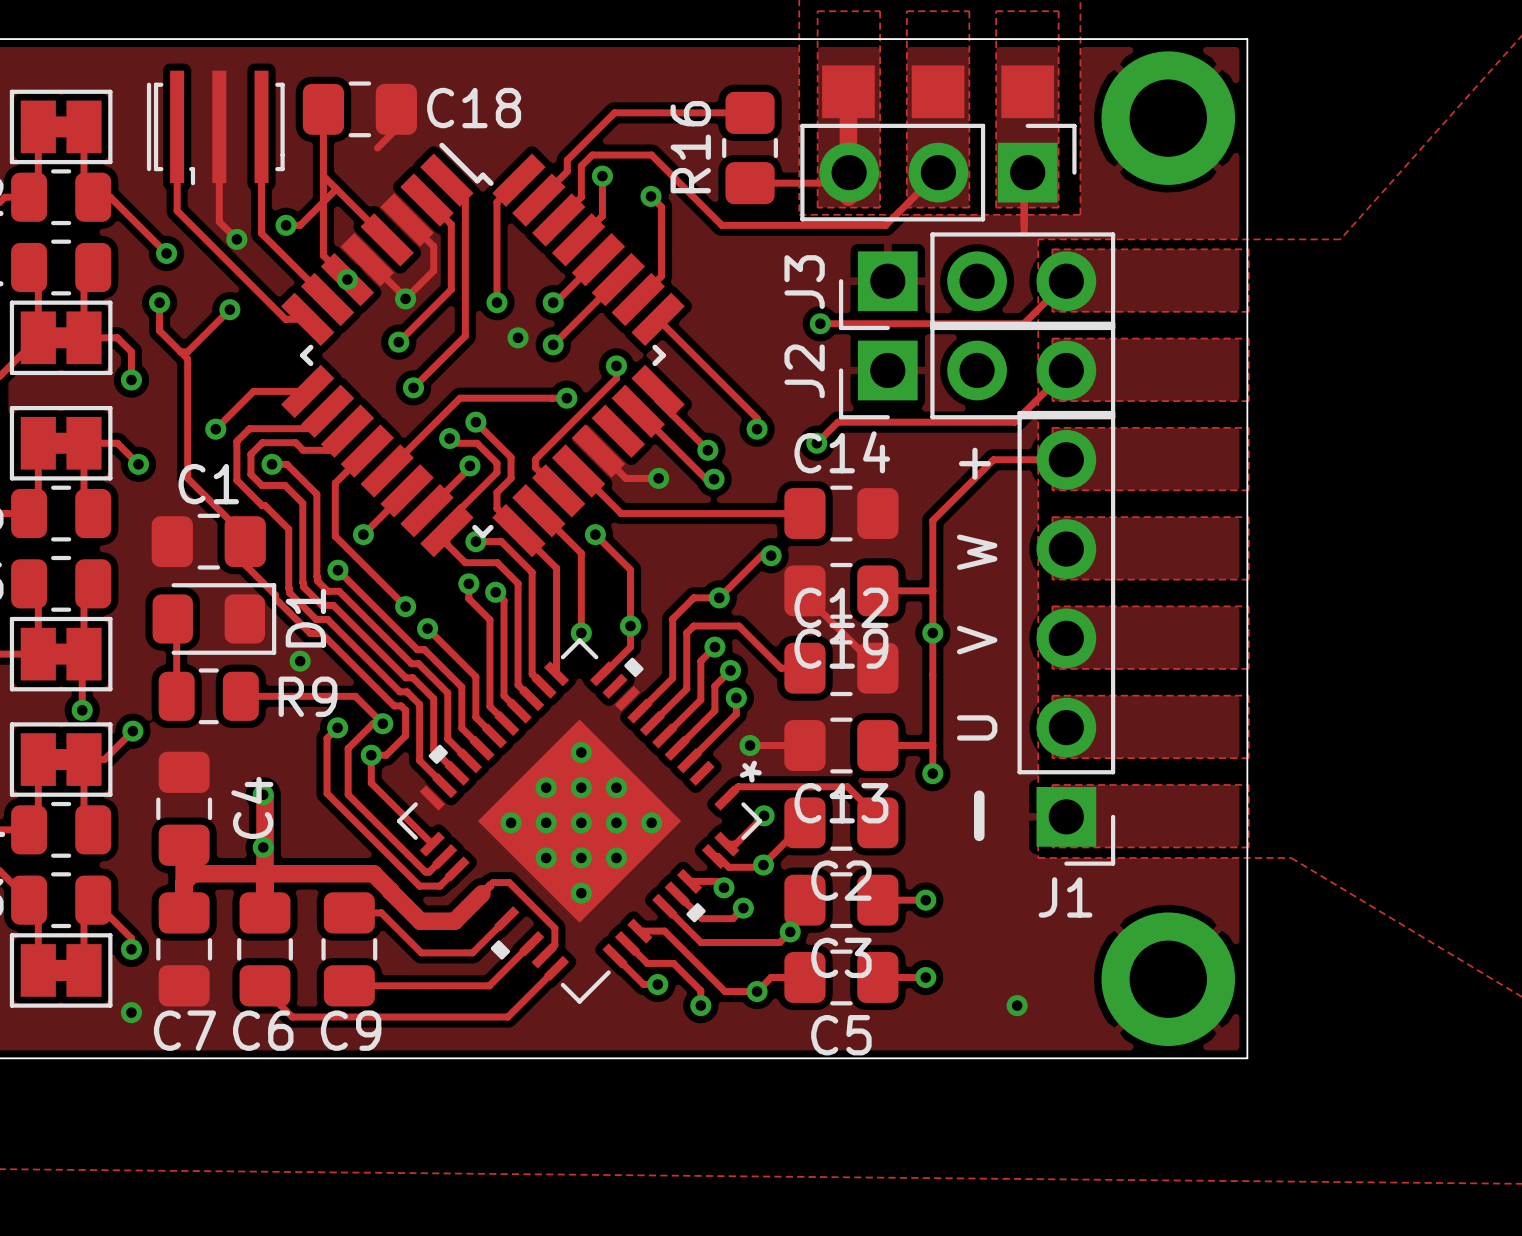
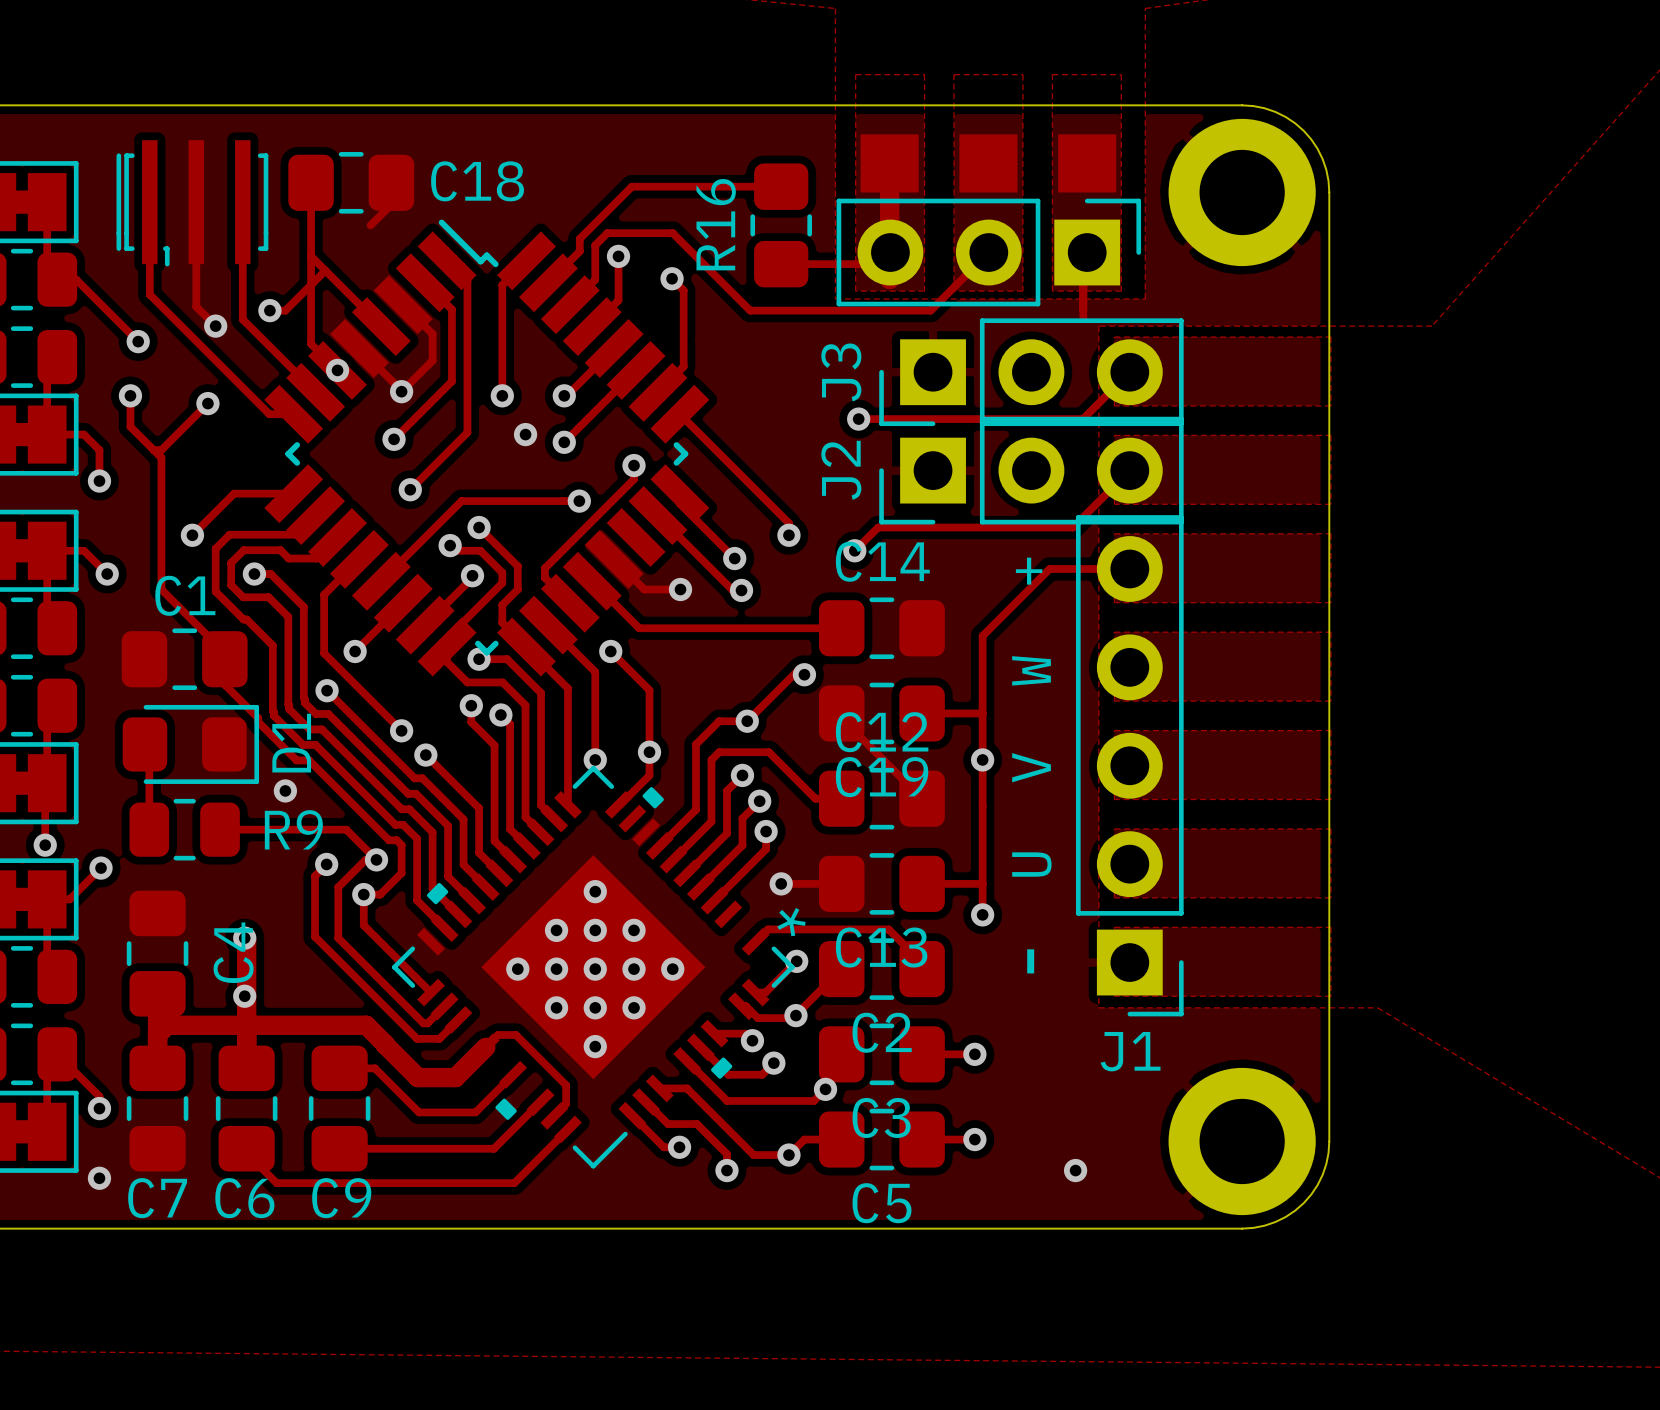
board edge: (1168, 39) (1247, 39) (1247, 118) -> (1242, 105) (1275, 111) (1303, 130) (1322, 159) (1329, 192)
board edge: (1247, 979) (1247, 1058) (1168, 1058) -> (1329, 1141) (1322, 1174) (1303, 1203) (1275, 1222) (1242, 1228)

